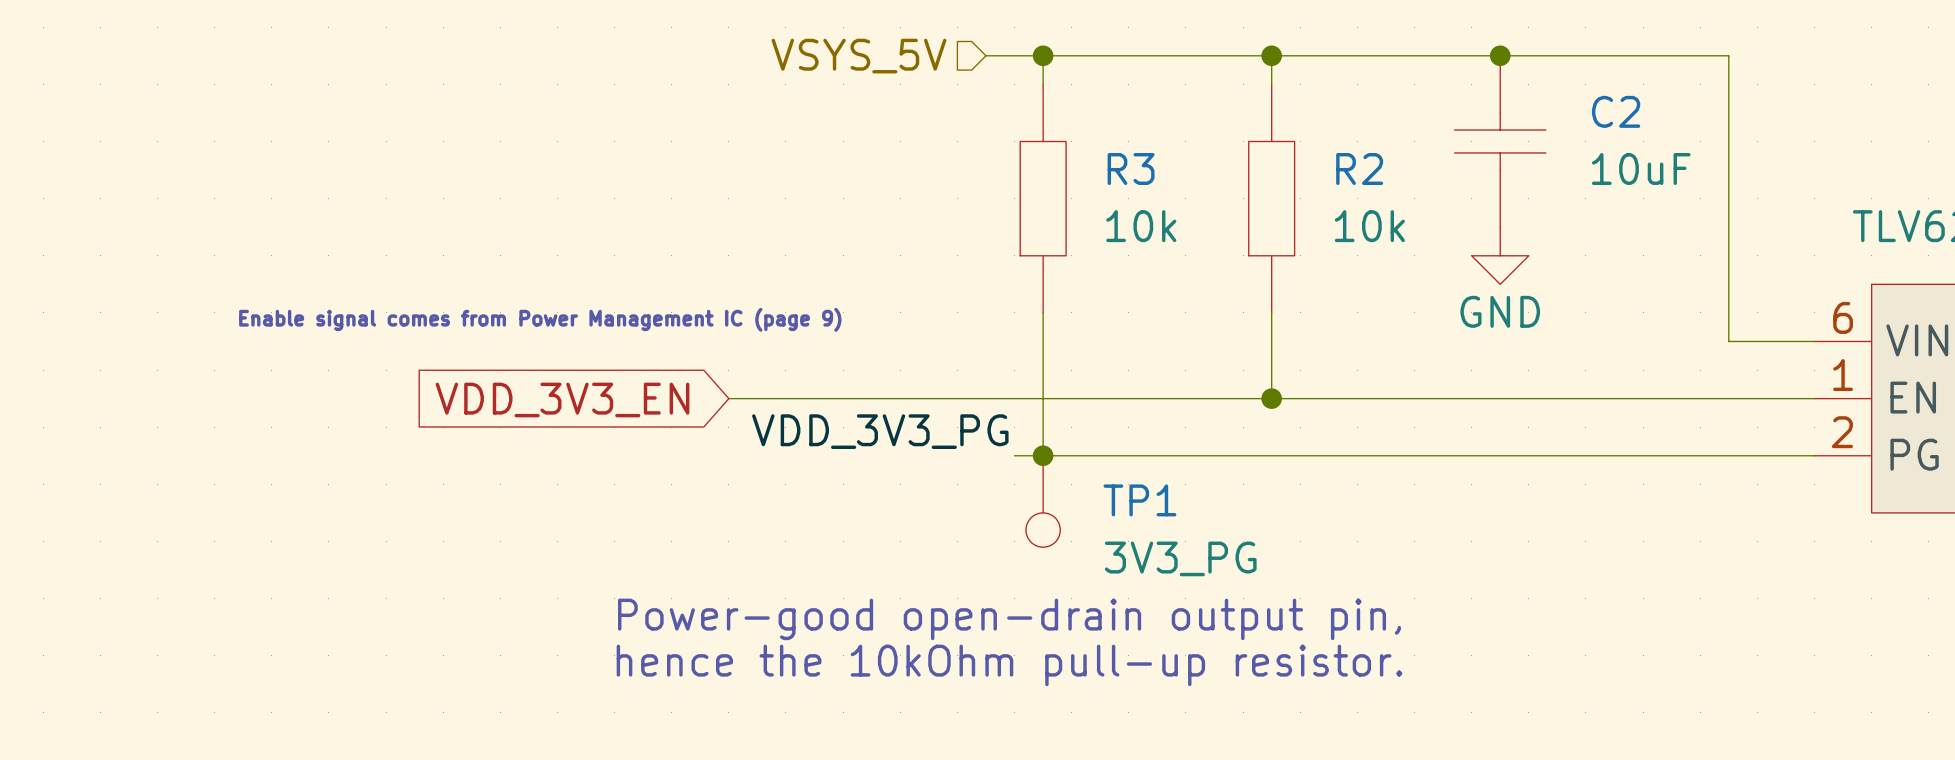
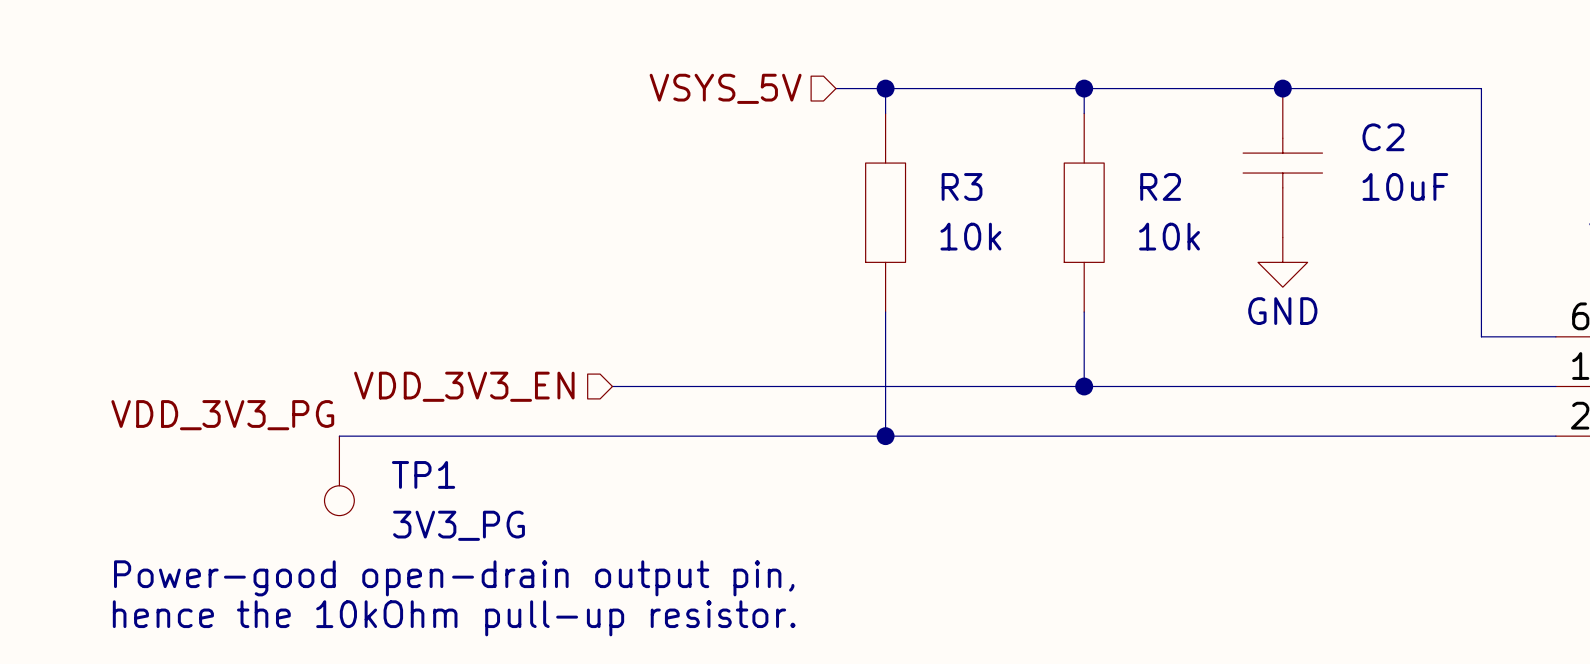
text: Enable signal comes from Power Management IC (page 9) (540, 319) -> none
hierarchical label: none -> VDD_3V3_EN (464, 386)
global label: VDD_3V3_EN (562, 399) -> none
label: none -> VDD_3V3_PG (222, 415)
label: VDD_3V3_PG (880, 431) -> none
wire: none -> (339, 436) (860, 436)
TP1 position: (1043, 501) -> (339, 475)
text position: Power-good open-drain output pin, (1009, 619) -> Power-good open-drain output pin, (454, 578)
text position: hence the 10kOhm pull-up resistor. (1009, 665) -> hence the 10kOhm pull-up resistor. (454, 618)

